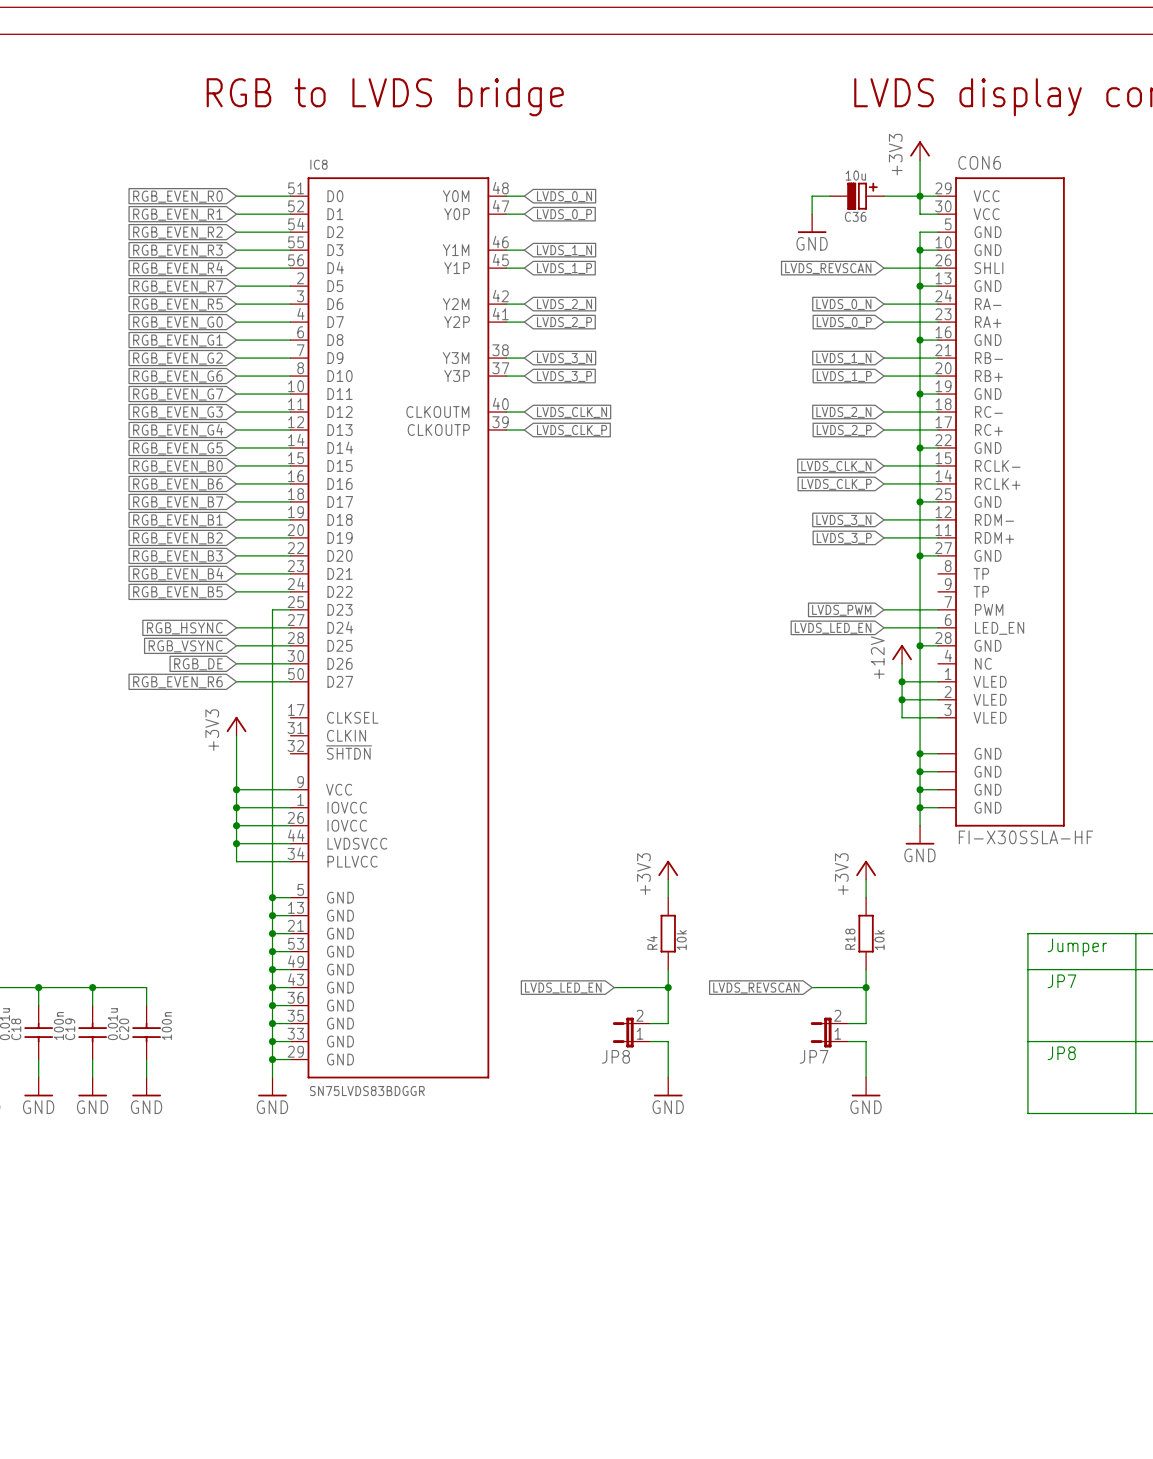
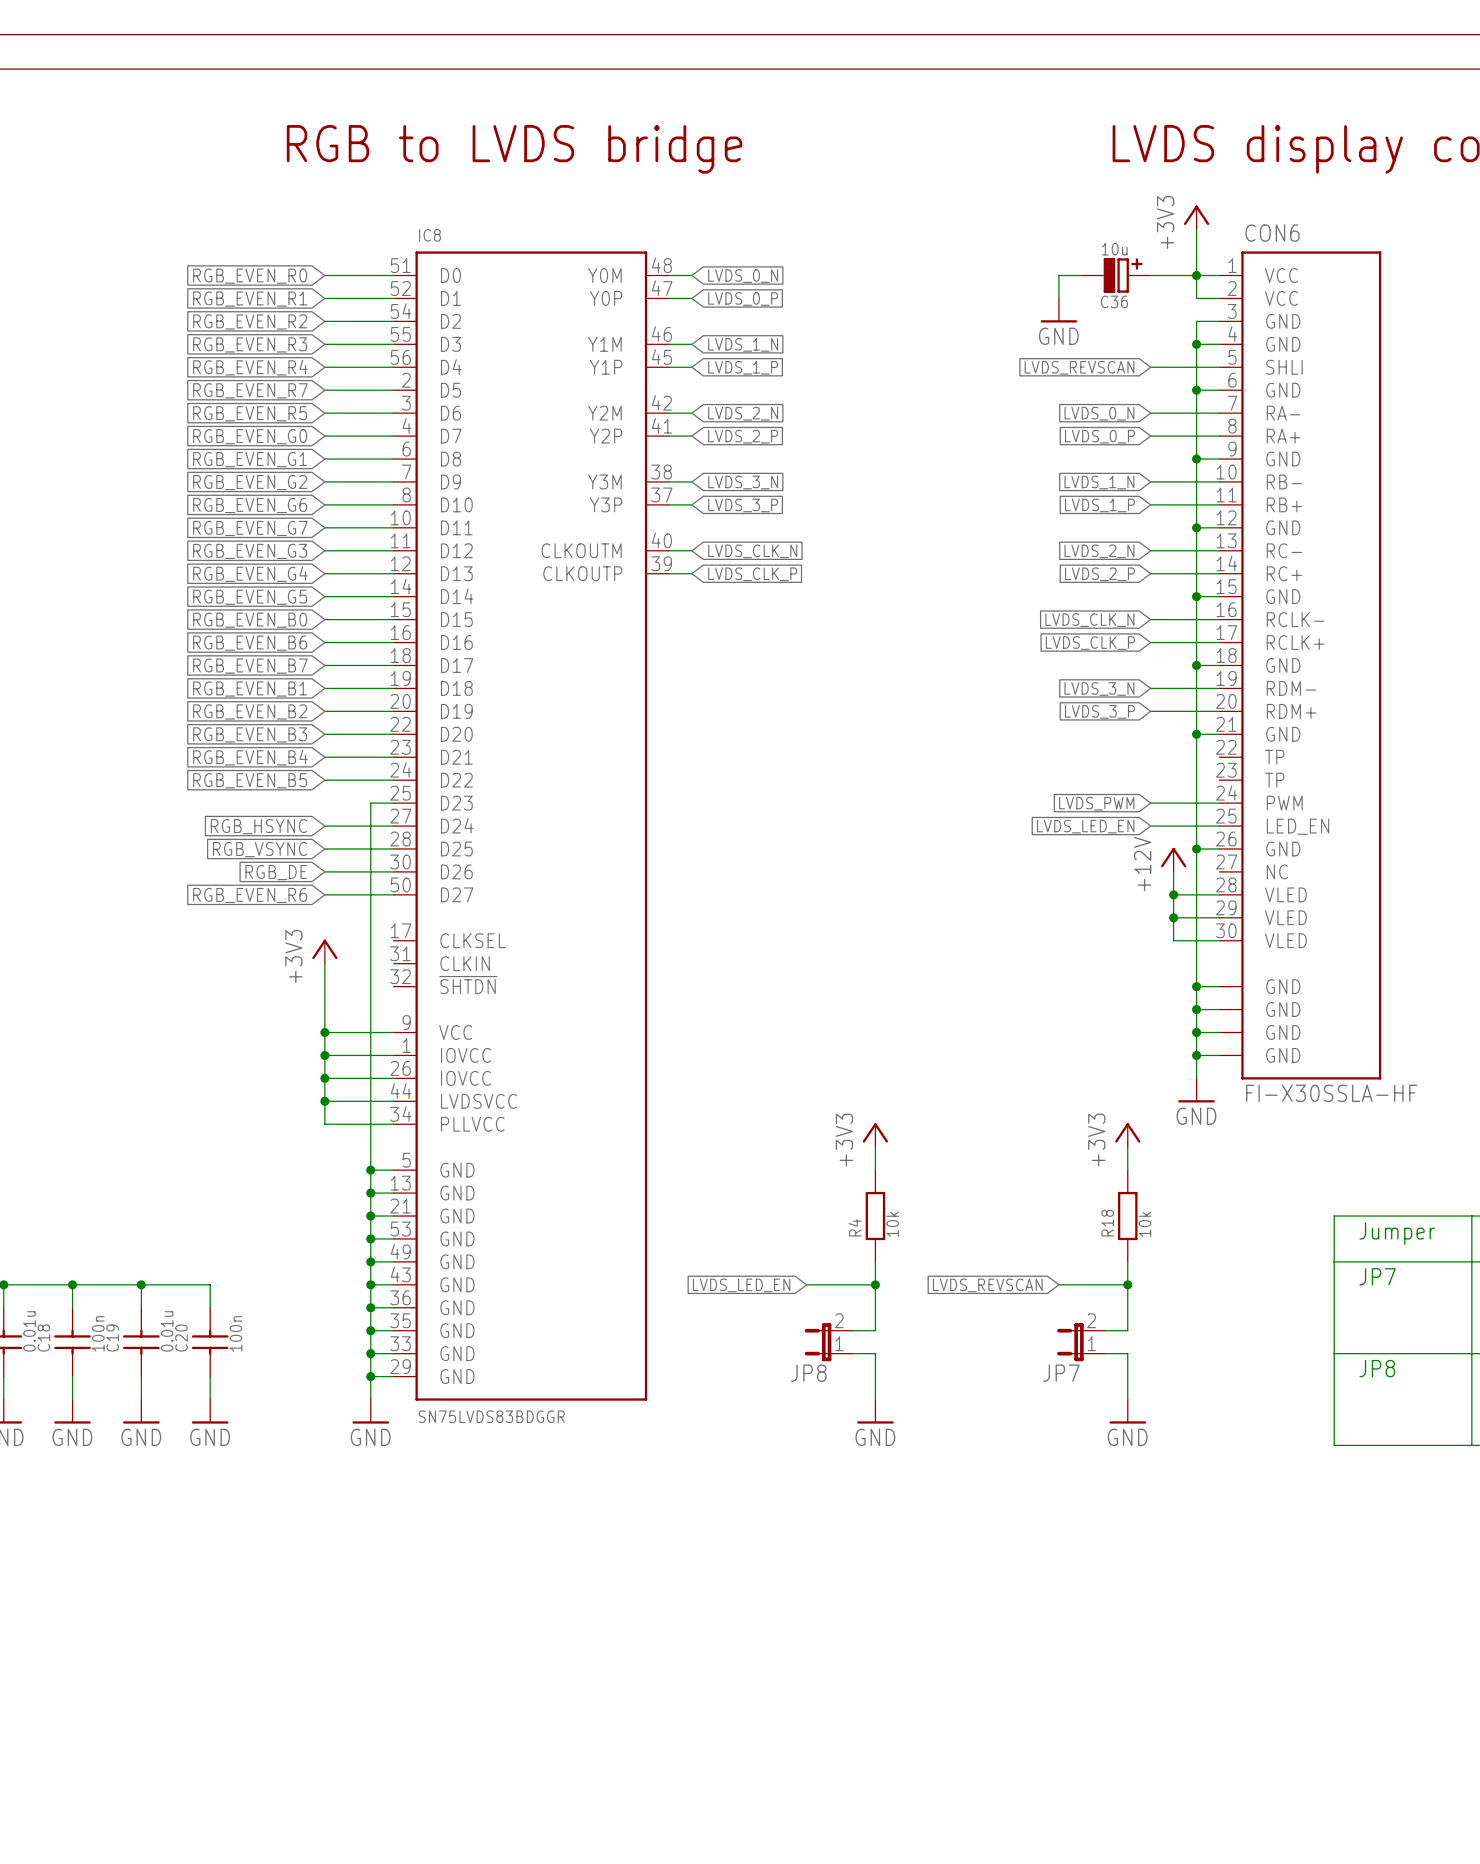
CON6 symbol: [938, 177, 1065, 827] -> [1219, 251, 1382, 1080]

